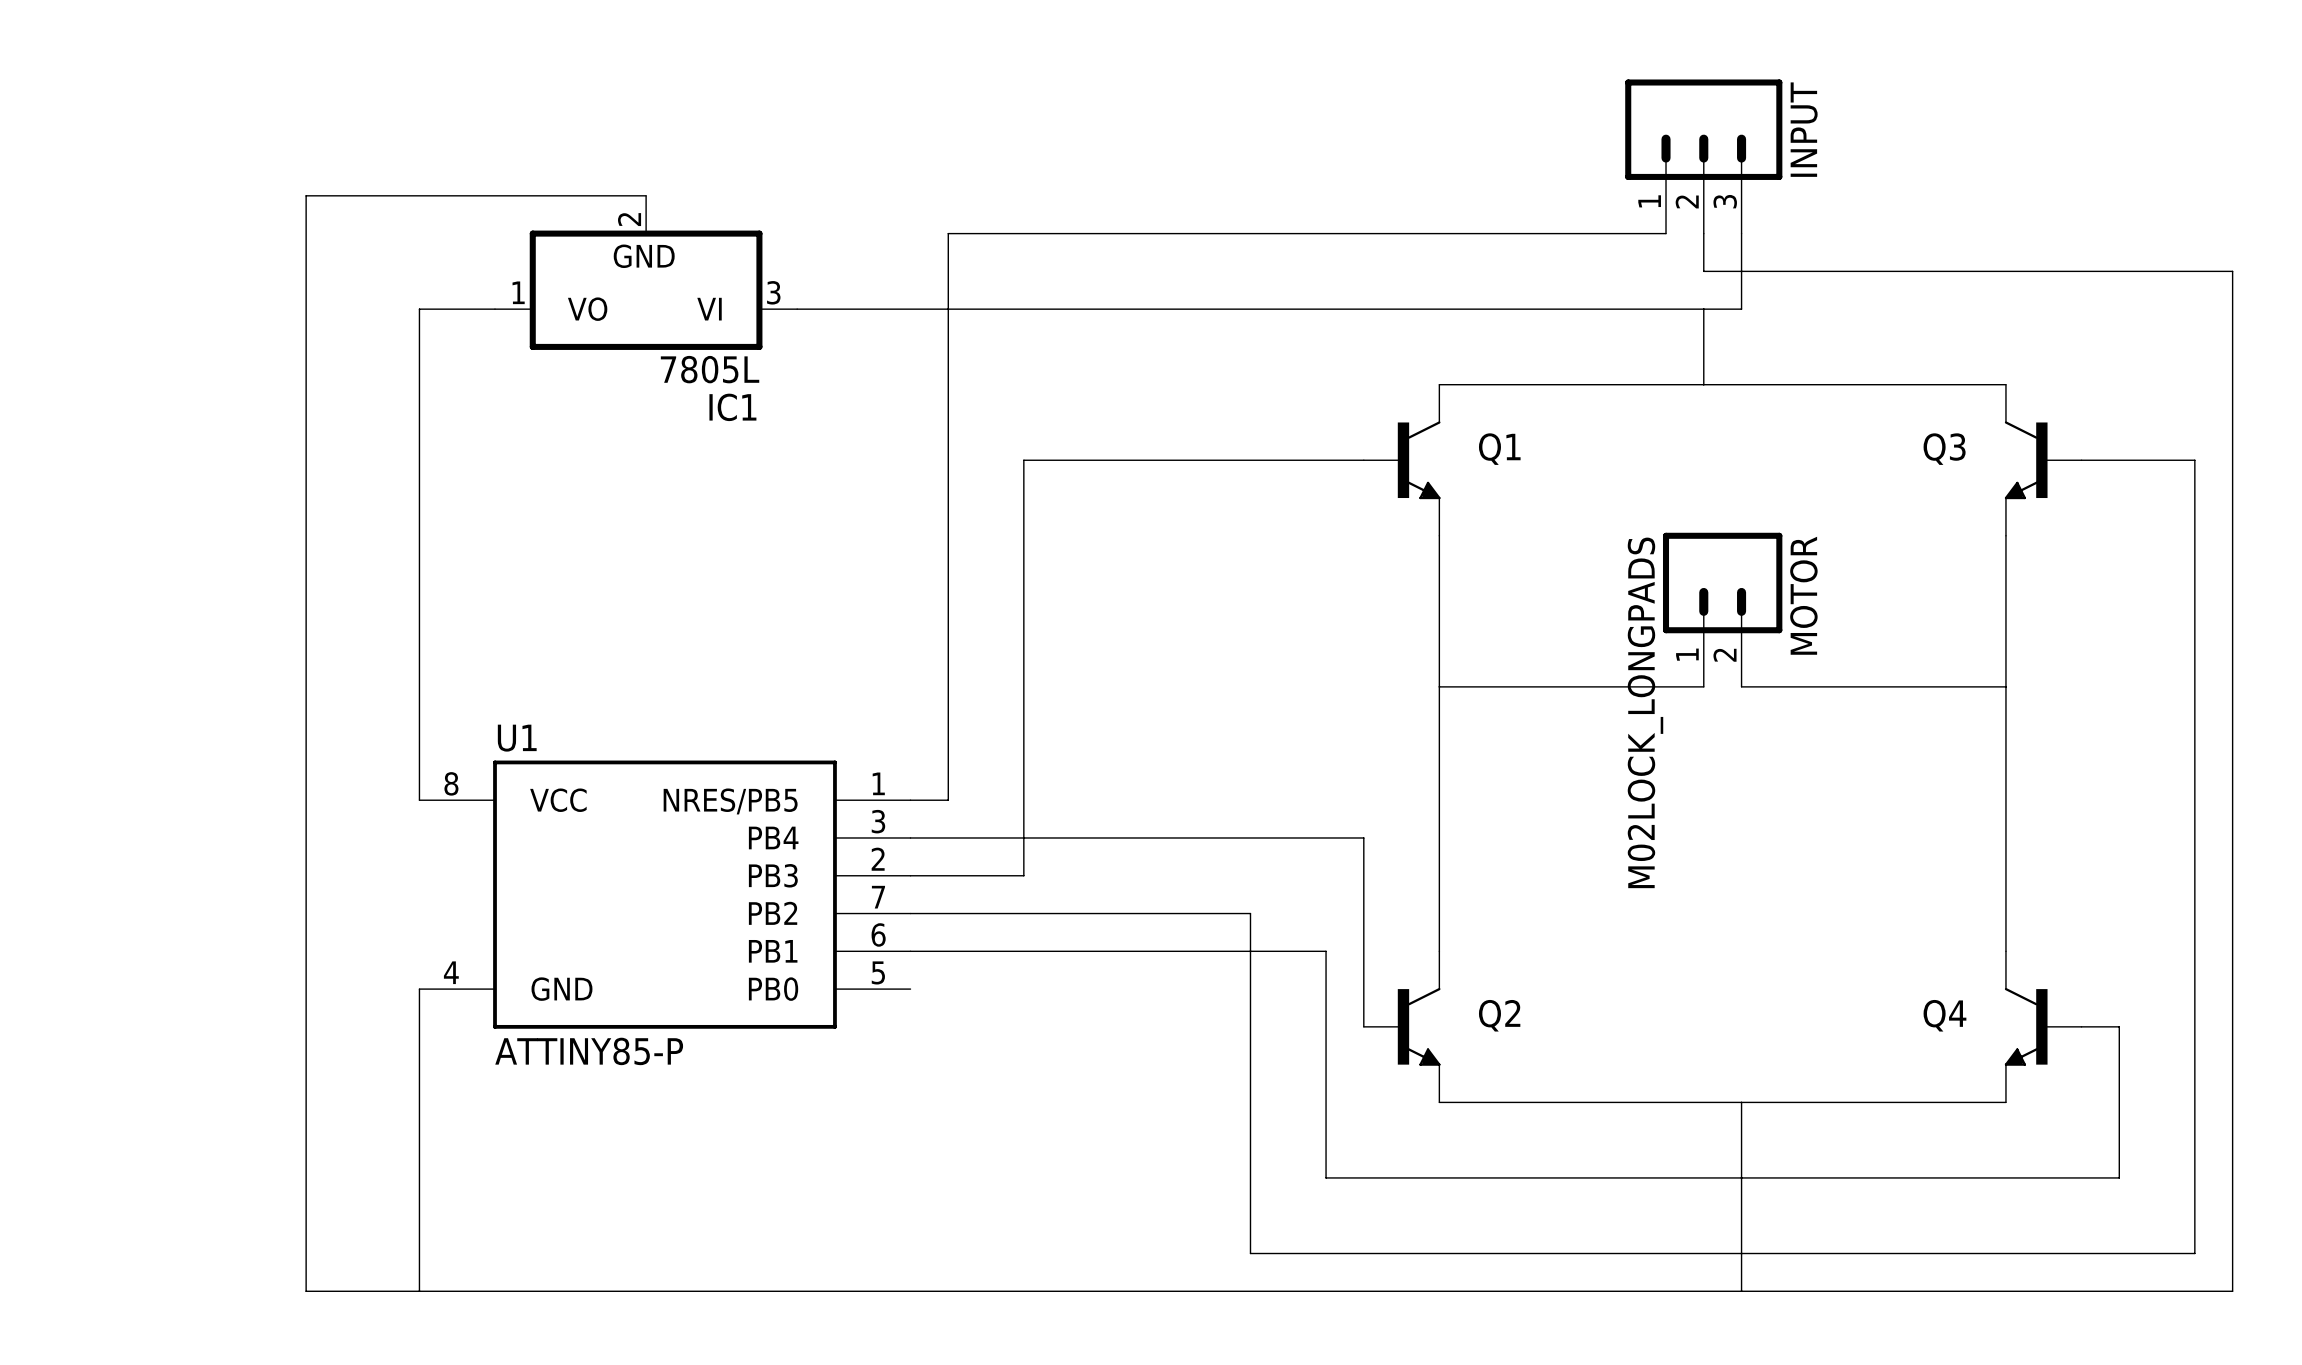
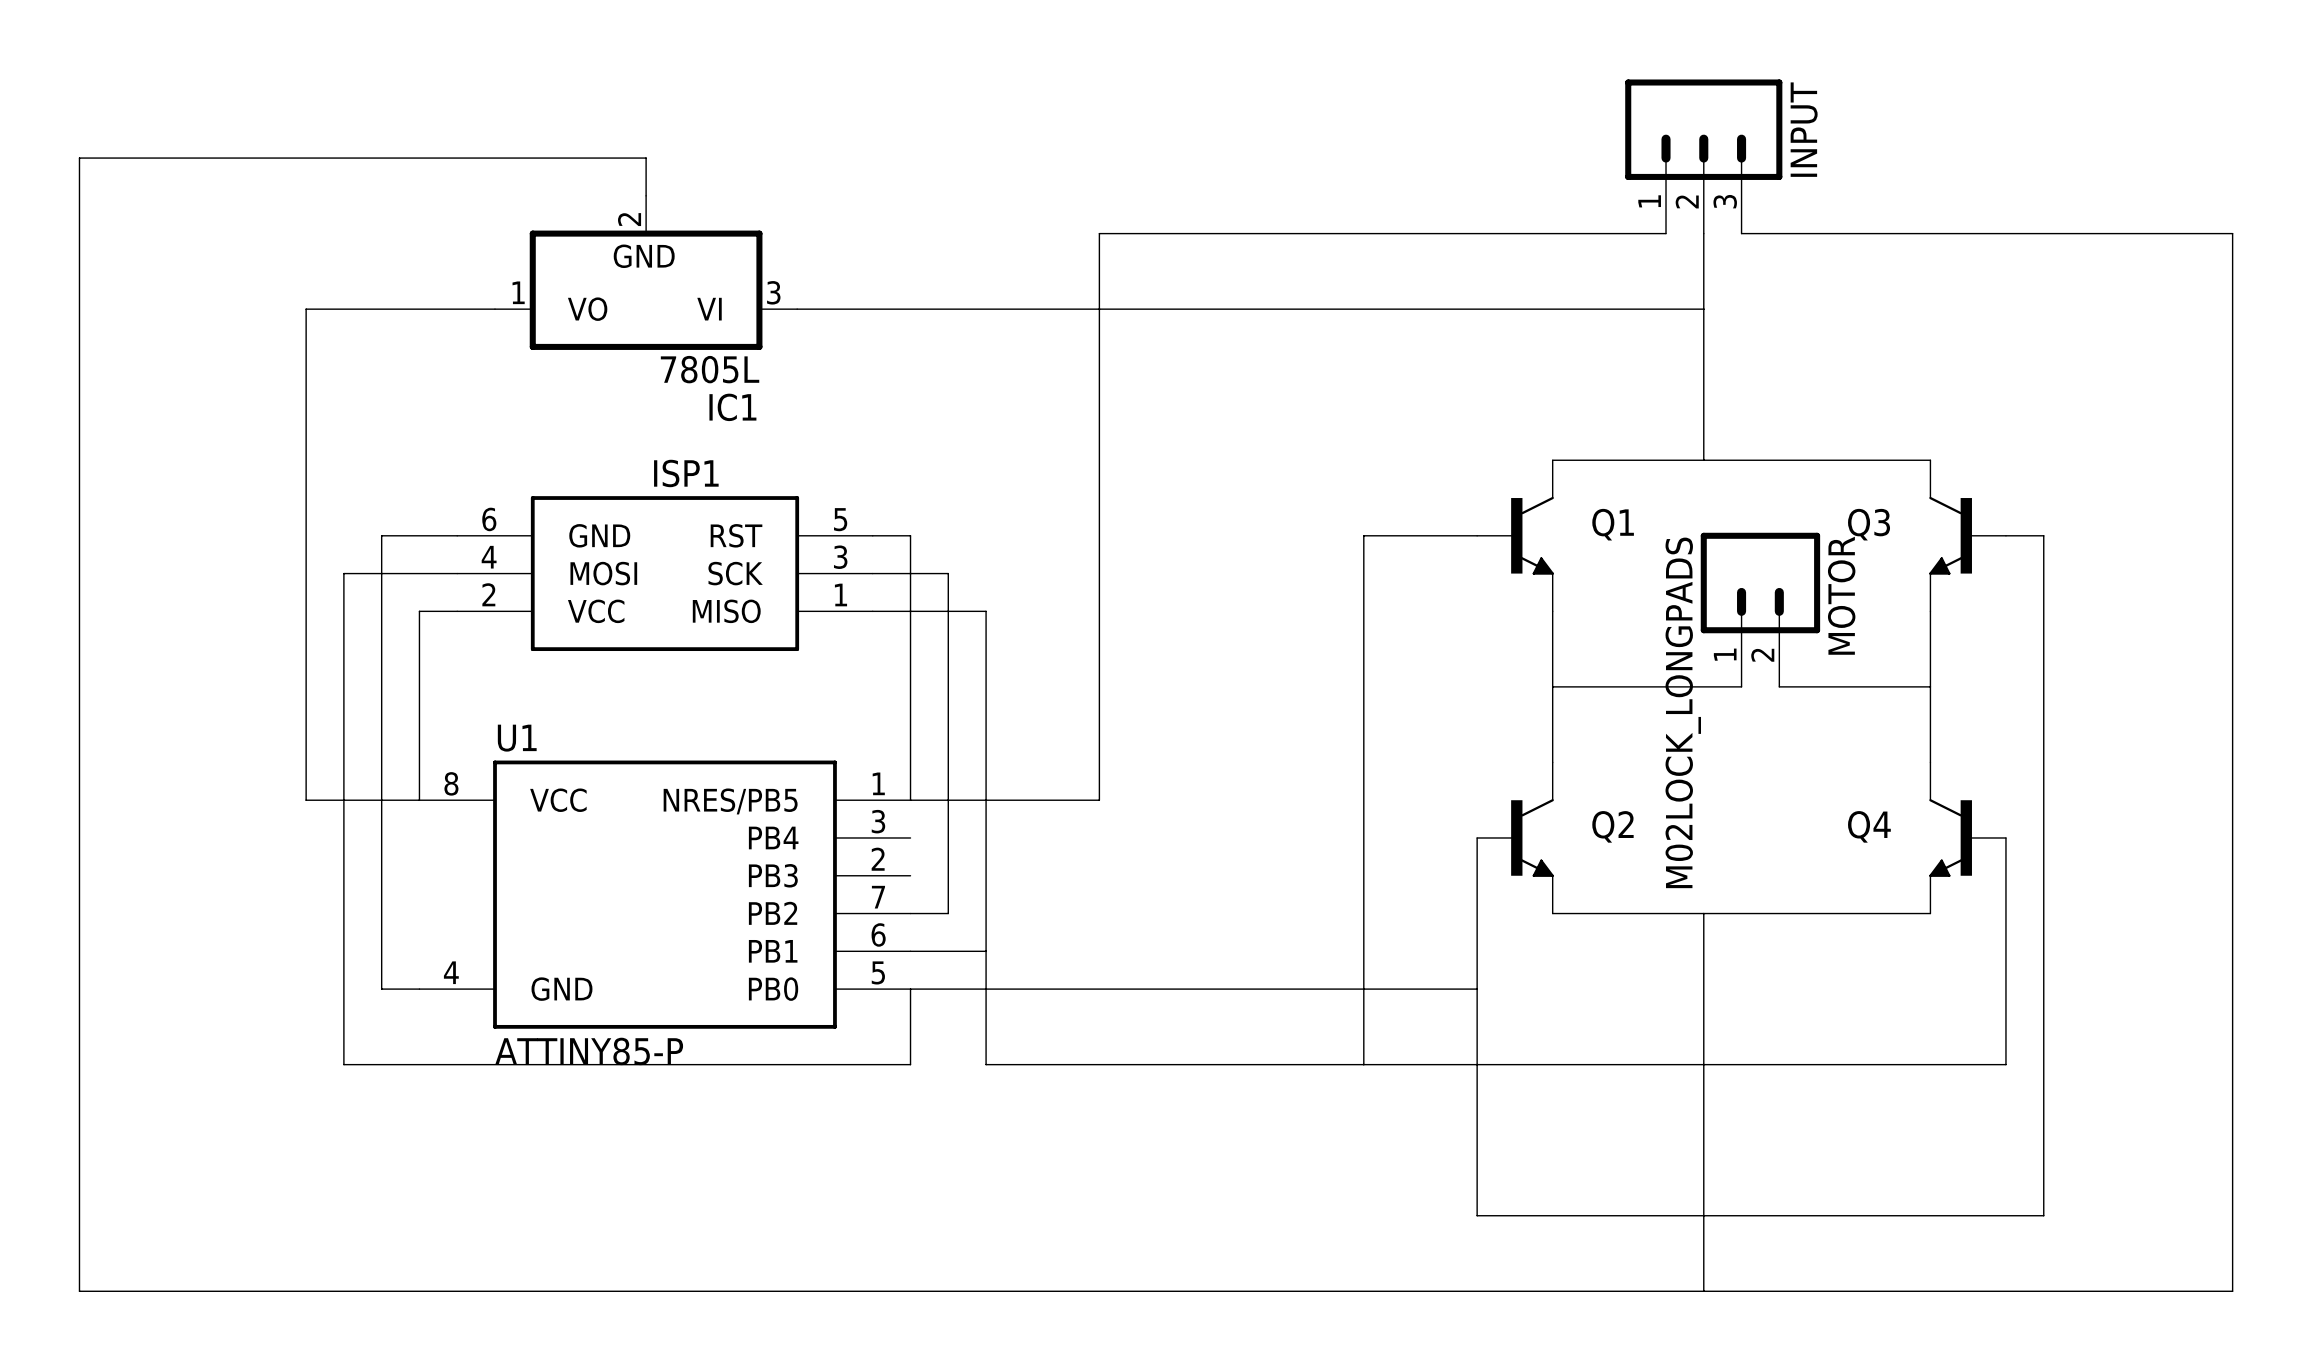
wire: (646, 195) (306, 195) (306, 309) -> (419, 309) (306, 309)
wire: none -> (646, 195) (646, 158) (79, 158) (79, 1291) (306, 1291)
wire: (1099, 233) (948, 233) (948, 573) -> (1099, 233) (1099, 800) (948, 800) (948, 913)
wire: (1741, 233) (1741, 309) (1703, 309) -> (1703, 271) (1703, 309)
wire: (1703, 271) (2232, 271) -> (1741, 233) (2232, 233) (2232, 271)
wire: (419, 309) (419, 611) -> (457, 611) (419, 611)
wire: (1439, 384) (2005, 384) -> none
wire: none -> (1703, 384) (1703, 460)
wire: (1363, 460) (1023, 460) (1023, 875) (910, 875) -> none
Q1 position: (1402, 460) -> (1515, 535)
wire: none -> (1552, 460) (1930, 460)
Q3 position: (2043, 460) -> (1967, 535)
wire: (2081, 460) (2194, 460) (2194, 1253) (1250, 1253) (1250, 913) (948, 913) -> none
wire: none -> (872, 535) (910, 535) (910, 800)
wire: (1439, 535) (1439, 951) -> none
wire: (2005, 535) (2005, 837) -> (2005, 535) (2043, 535) (2043, 1215) (1477, 1215) (1477, 837)
wire: none -> (457, 573) (343, 573) (343, 1064) (910, 1064) (910, 989) (1477, 989)
ISP1: none -> (664, 573)
wire: none -> (872, 573) (948, 573)
MOTOR position: (1722, 609) -> (1760, 609)
wire: none -> (872, 611) (986, 611) (986, 1064) (2005, 1064) (2005, 951)
wire: none -> (1552, 611) (1552, 762)
wire: none -> (1930, 611) (1930, 762)
wire: (1439, 686) (1552, 686) -> none
wire: (1741, 686) (1779, 686) -> (1741, 686) (1703, 686)
wire: (1930, 686) (2005, 686) -> none
wire: (306, 800) (306, 1291) -> (306, 800) (419, 800)
wire: (910, 837) (1363, 837) -> (1477, 535) (1363, 535) (1363, 837)
wire: none -> (1552, 913) (1930, 913)
wire: none -> (1703, 913) (1703, 1291)
wire: (986, 951) (1326, 951) (1326, 1177) (2119, 1177) (2119, 1026) (2081, 1026) -> none
wire: (419, 989) (419, 1291) -> (419, 989) (381, 989) (381, 535) (457, 535)
wire: none -> (1363, 1026) (1363, 1064)
Q2 position: (1402, 1026) -> (1515, 837)
Q4 position: (2043, 1026) -> (1967, 837)
wire: (1439, 1102) (2005, 1102) -> none
wire: (1741, 1102) (1741, 1291) -> none

